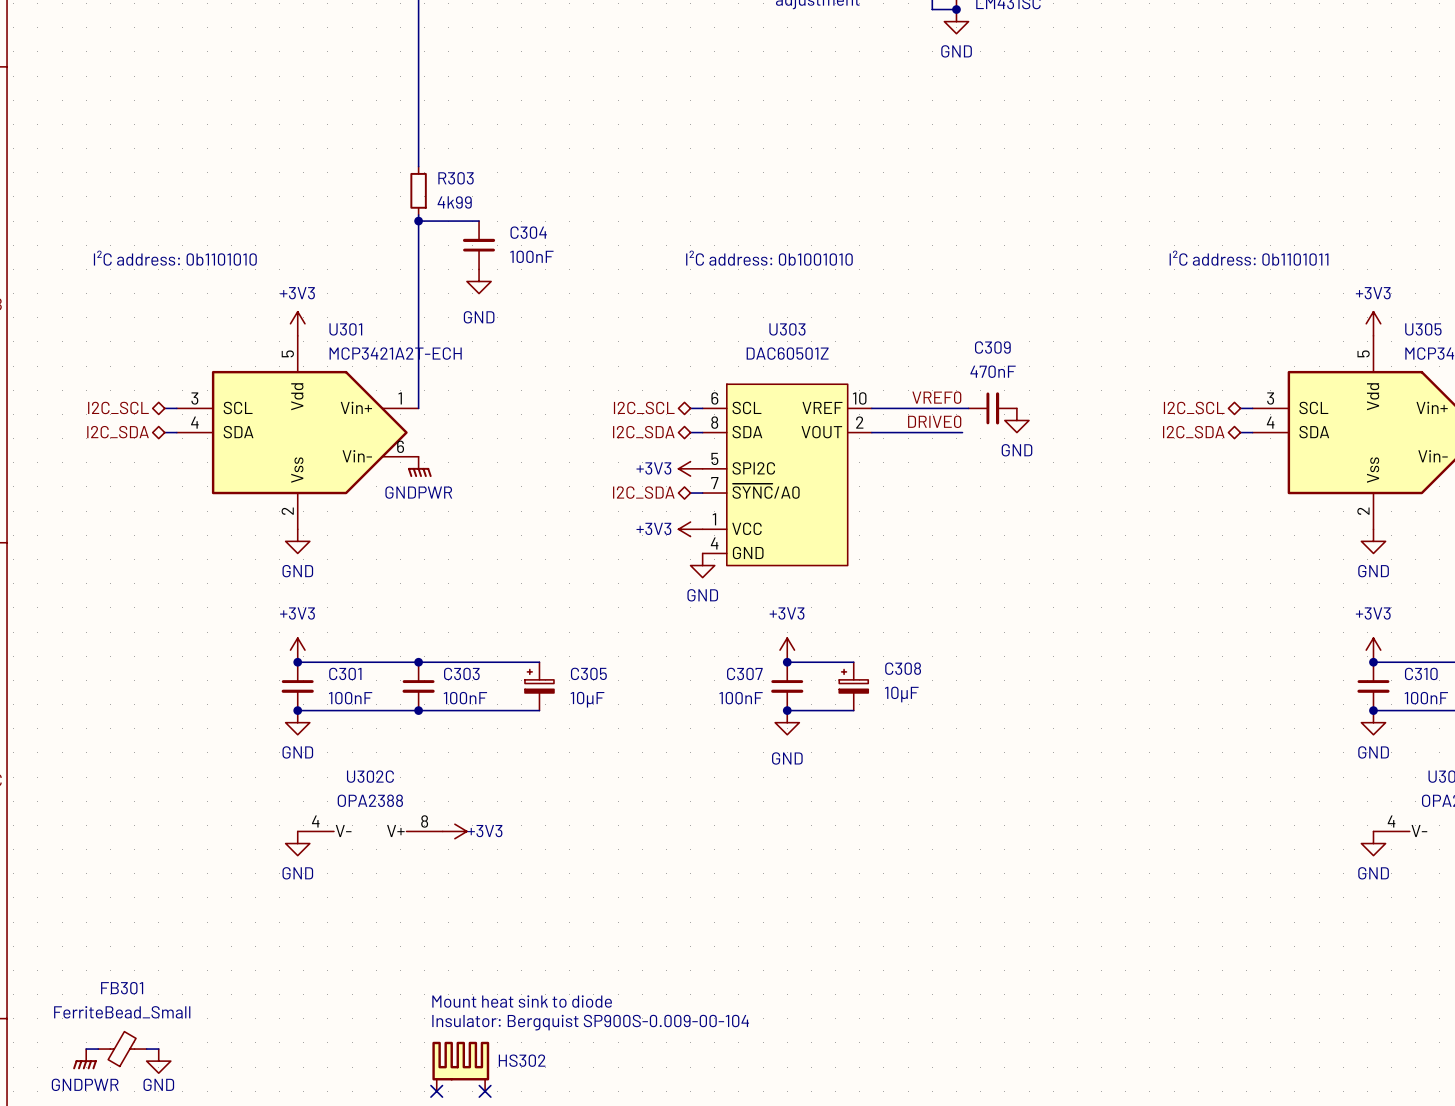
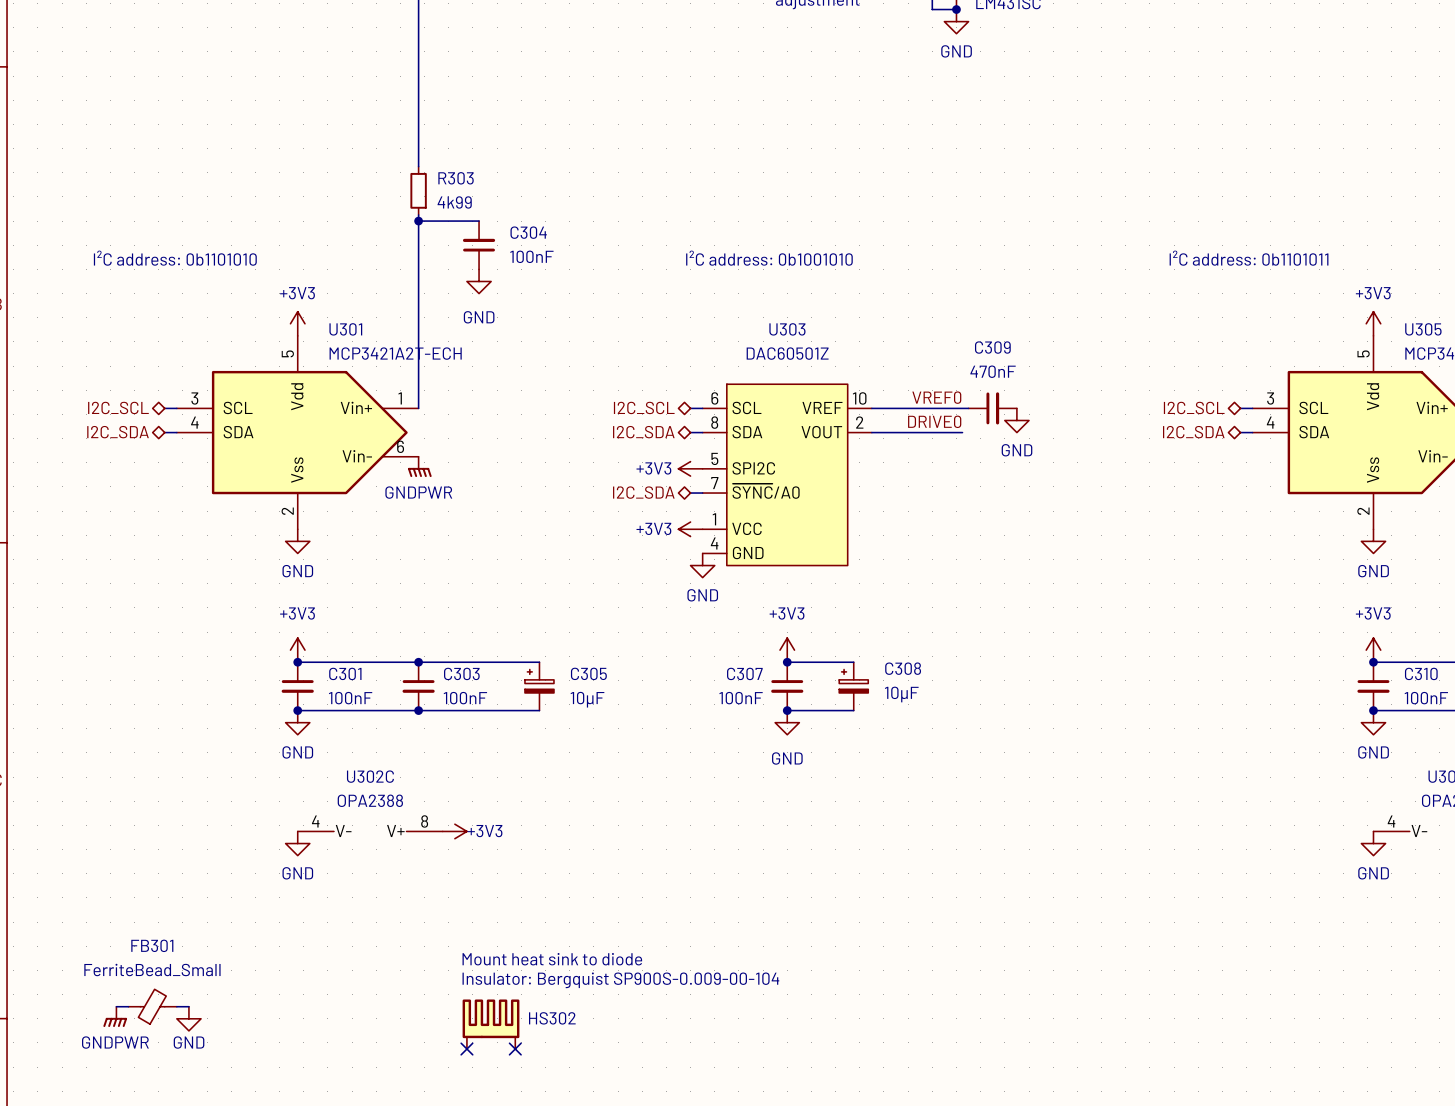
text position: Mount heat sink to diode (522, 1001) -> Mount heat sink to diode (552, 959)
text position: Insulator: Bergquist SP900S-0.009-00-104 (590, 1022) -> Insulator: Bergquist SP900S-0.009-00-104 (620, 980)
wire: (86, 1049) (98, 1049) -> (116, 1006) (128, 1006)
FB301 position: (122, 1049) -> (152, 1006)
wire: (146, 1049) (158, 1049) -> (176, 1006) (188, 1006)
no-connect mark: none -> (466, 1049)
no-connect mark: none -> (515, 1049)
power symbol position: GNDPWR (84, 1059) -> GNDPWR (115, 1016)
power symbol position: GND (158, 1061) -> GND (188, 1018)
HS302 position: (460, 1066) -> (491, 1024)
no-connect mark: (436, 1091) -> none
no-connect mark: (485, 1091) -> none

